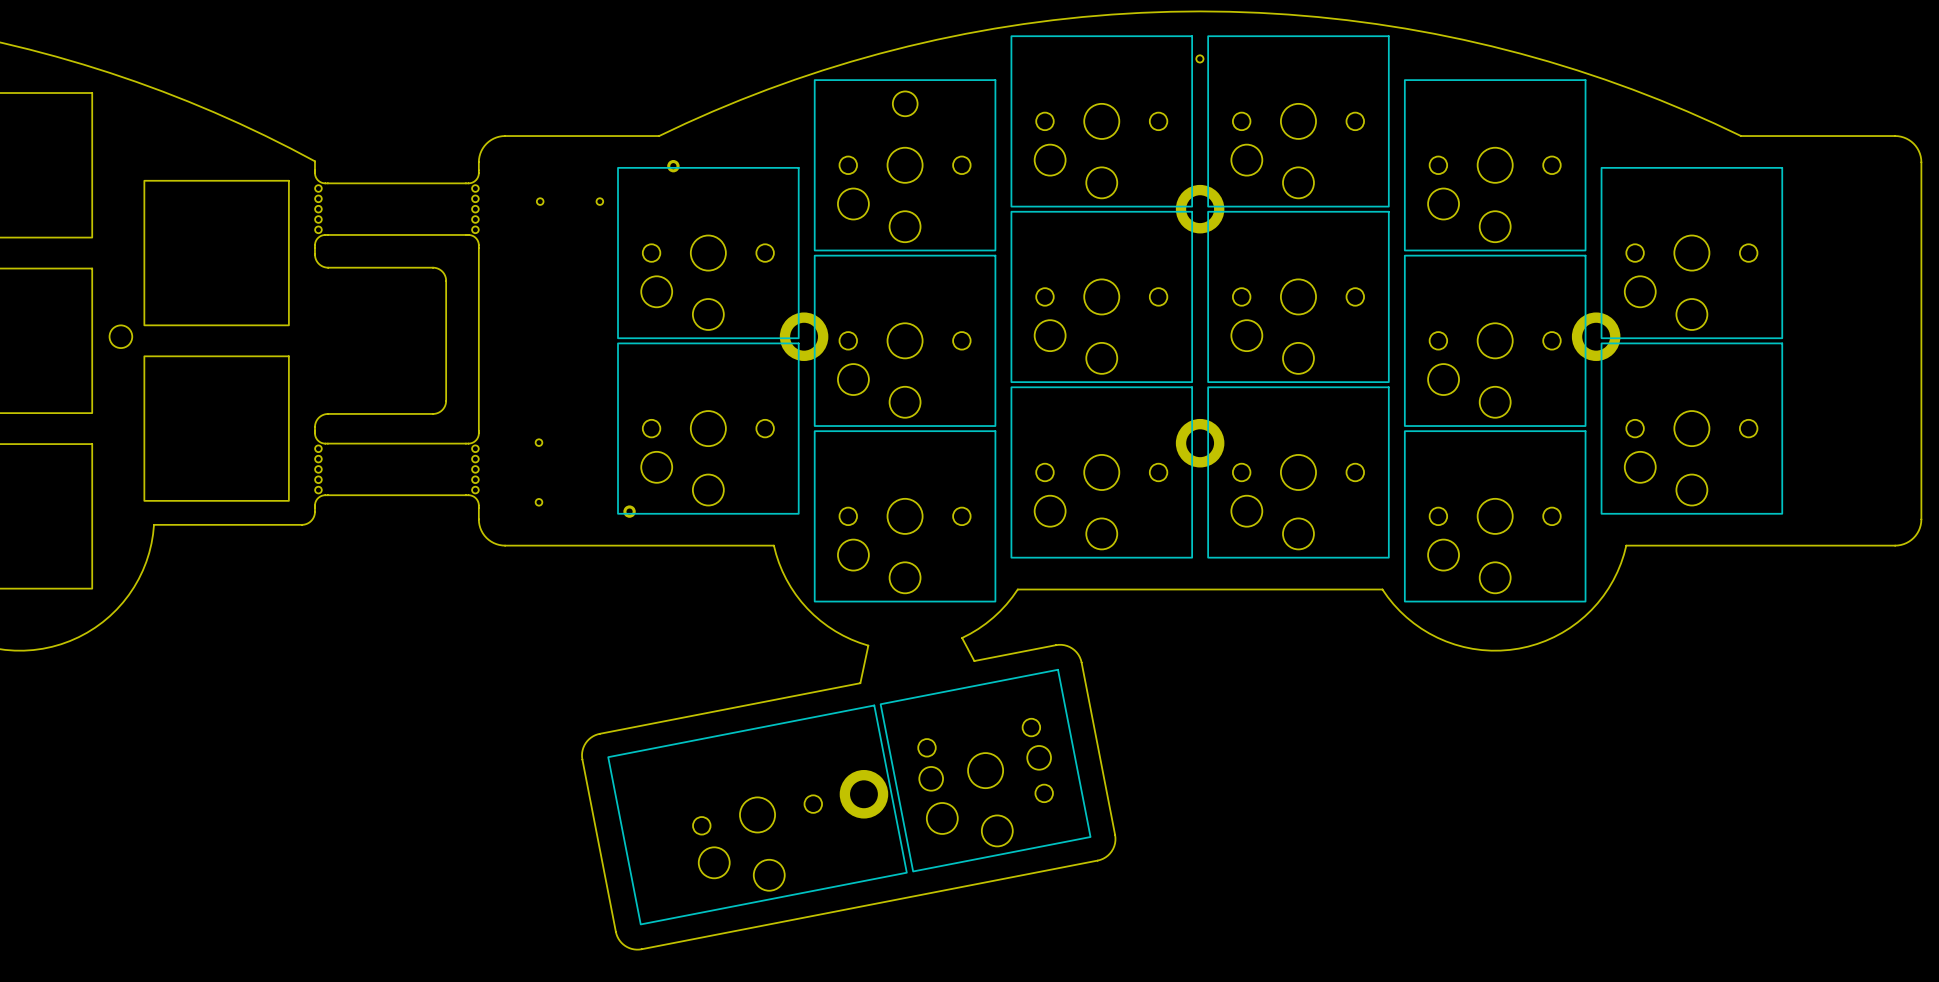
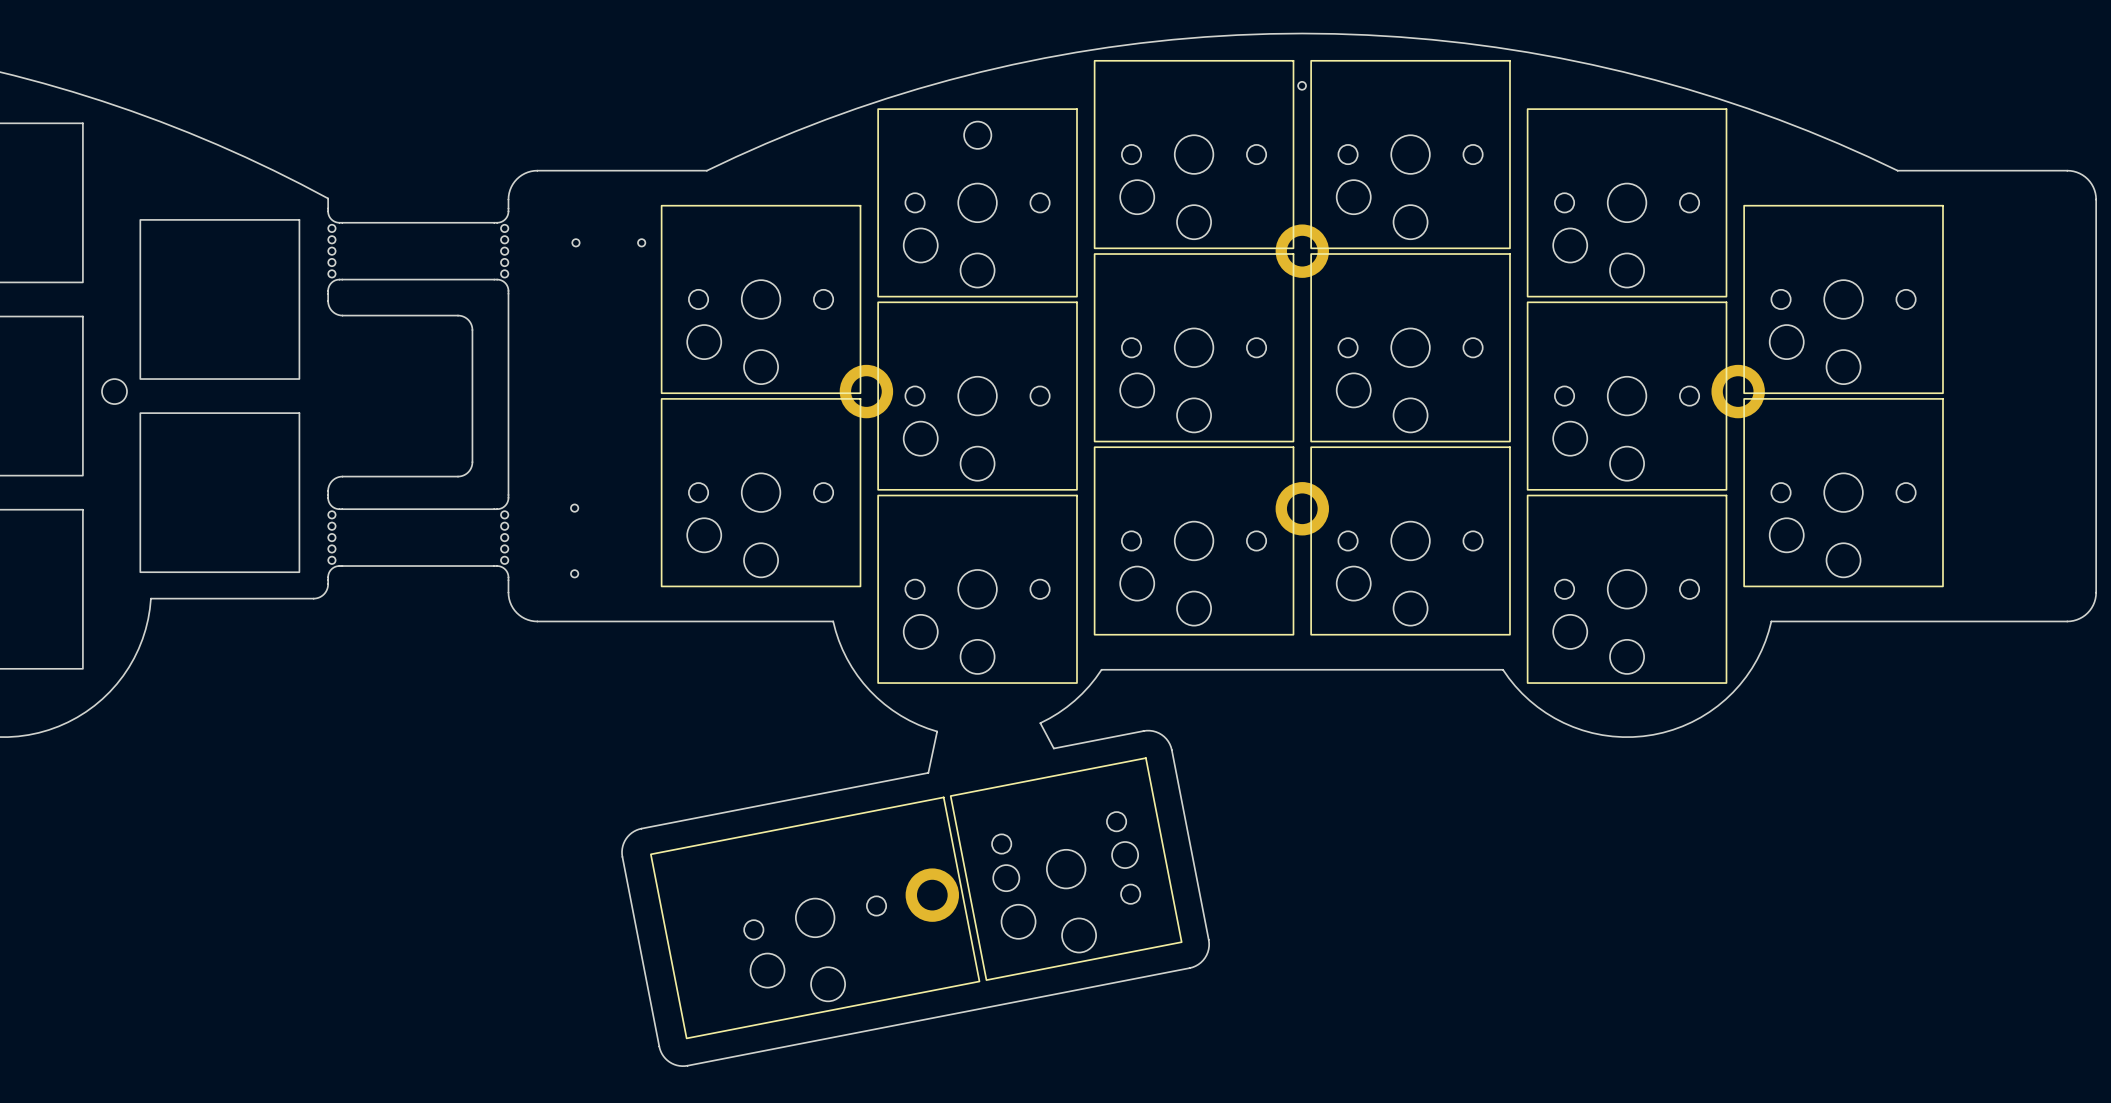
part: (673, 166) -> none
part: (629, 511) -> none

